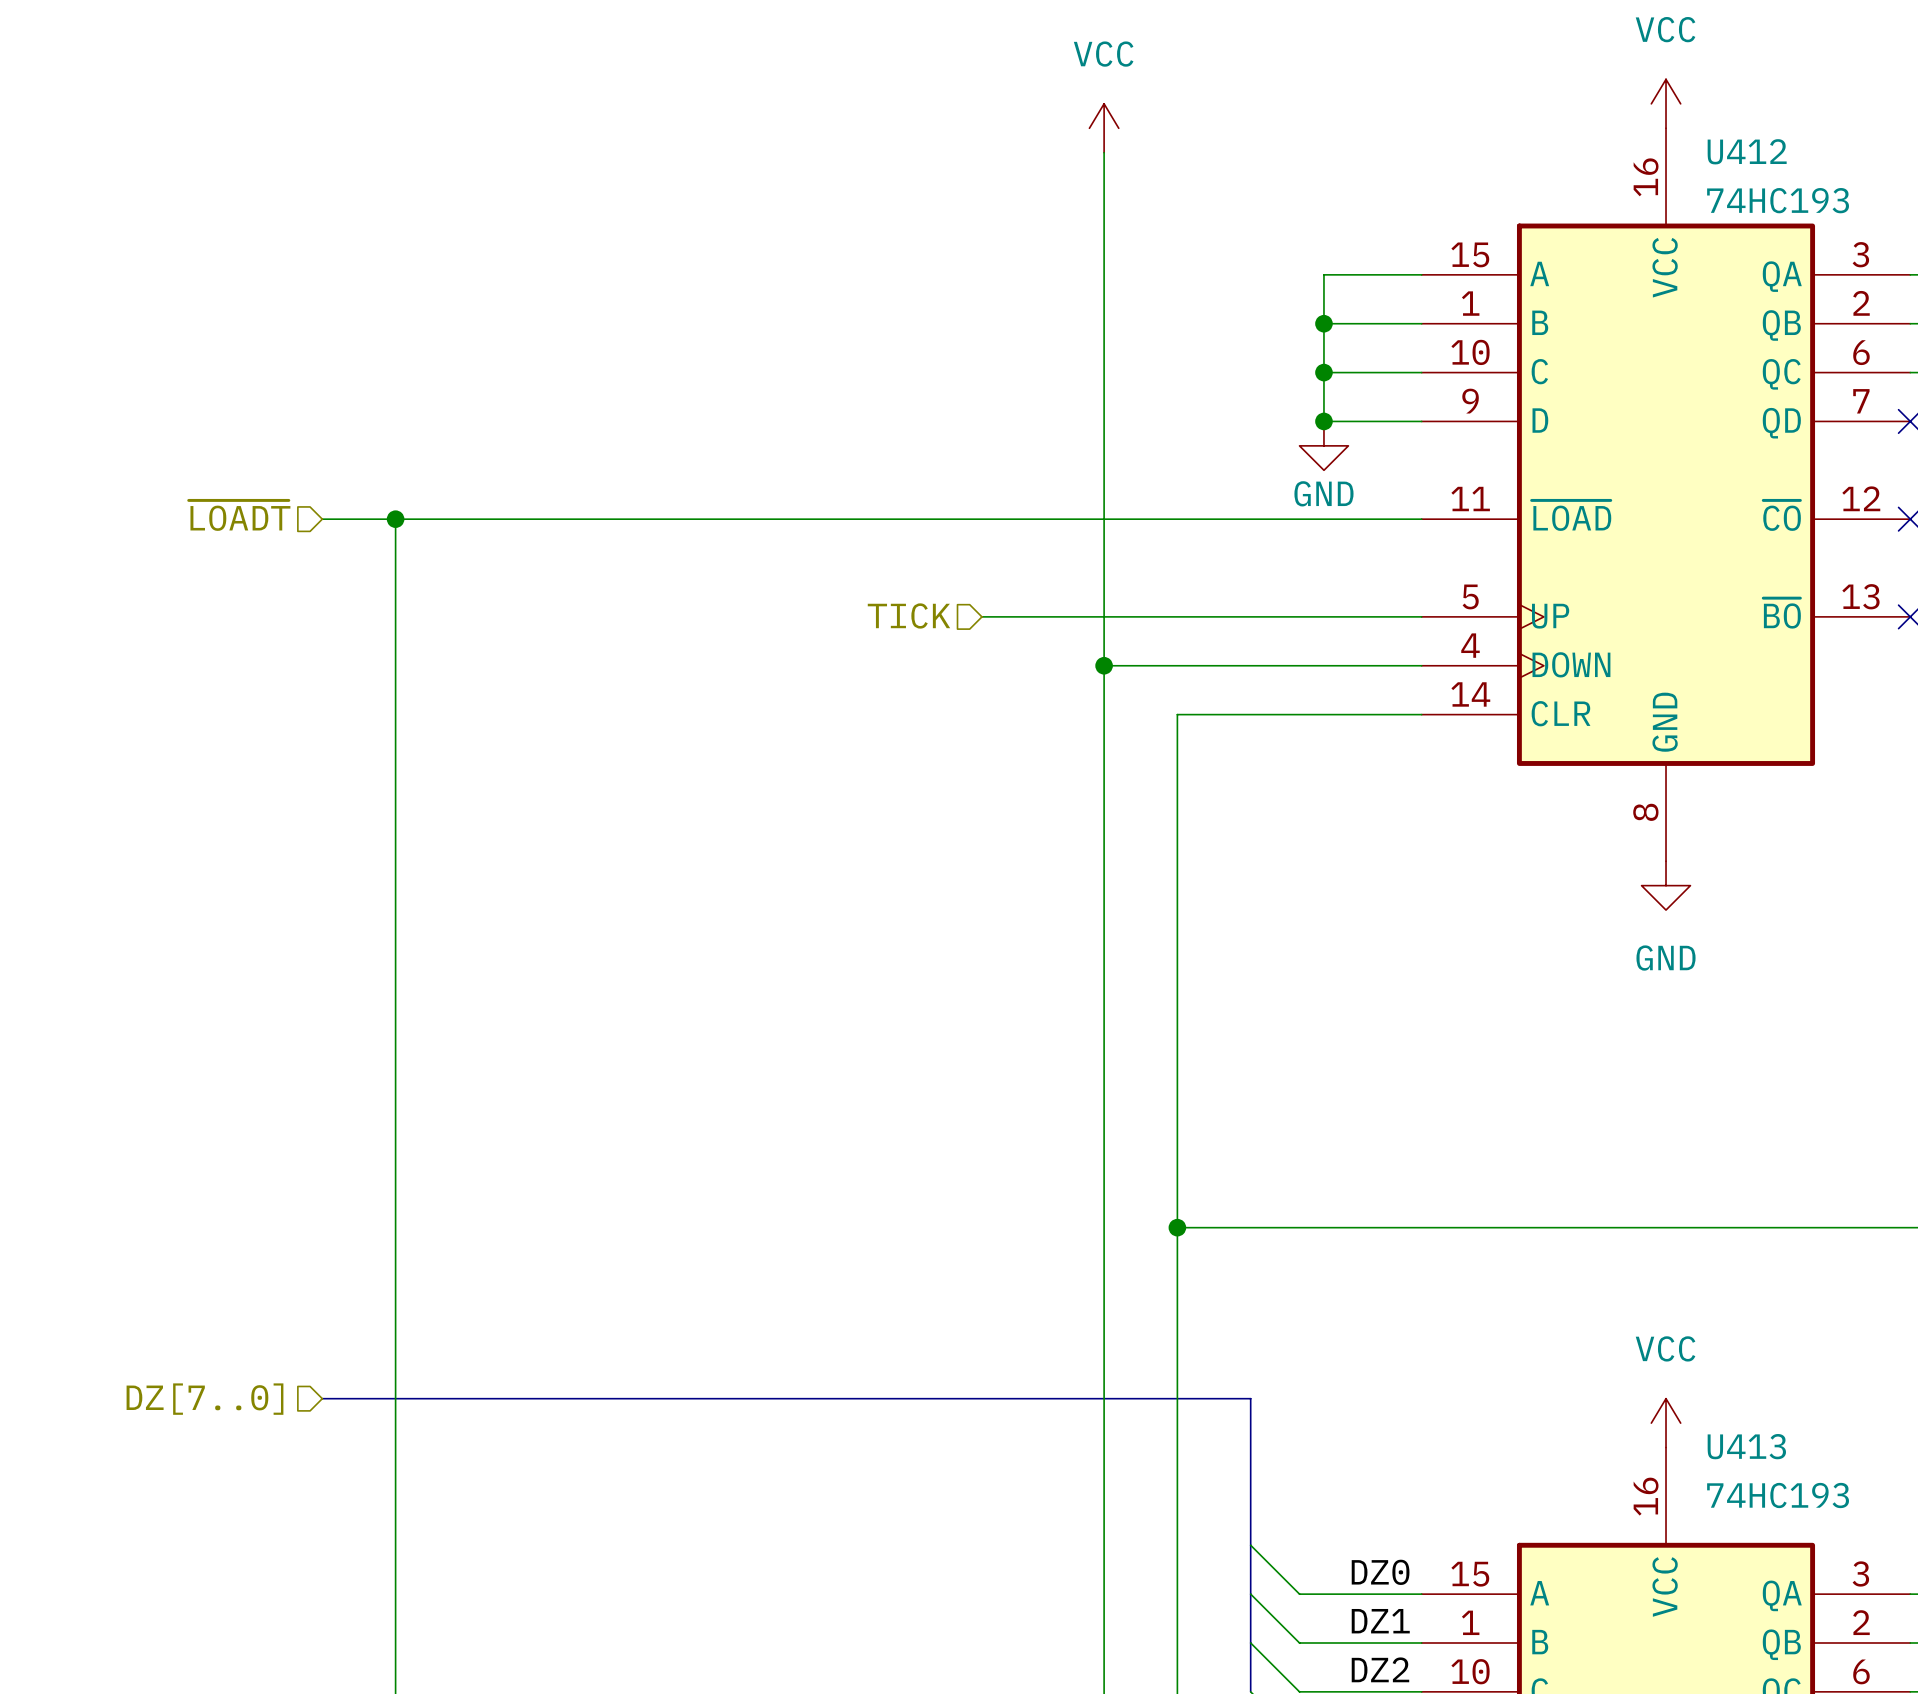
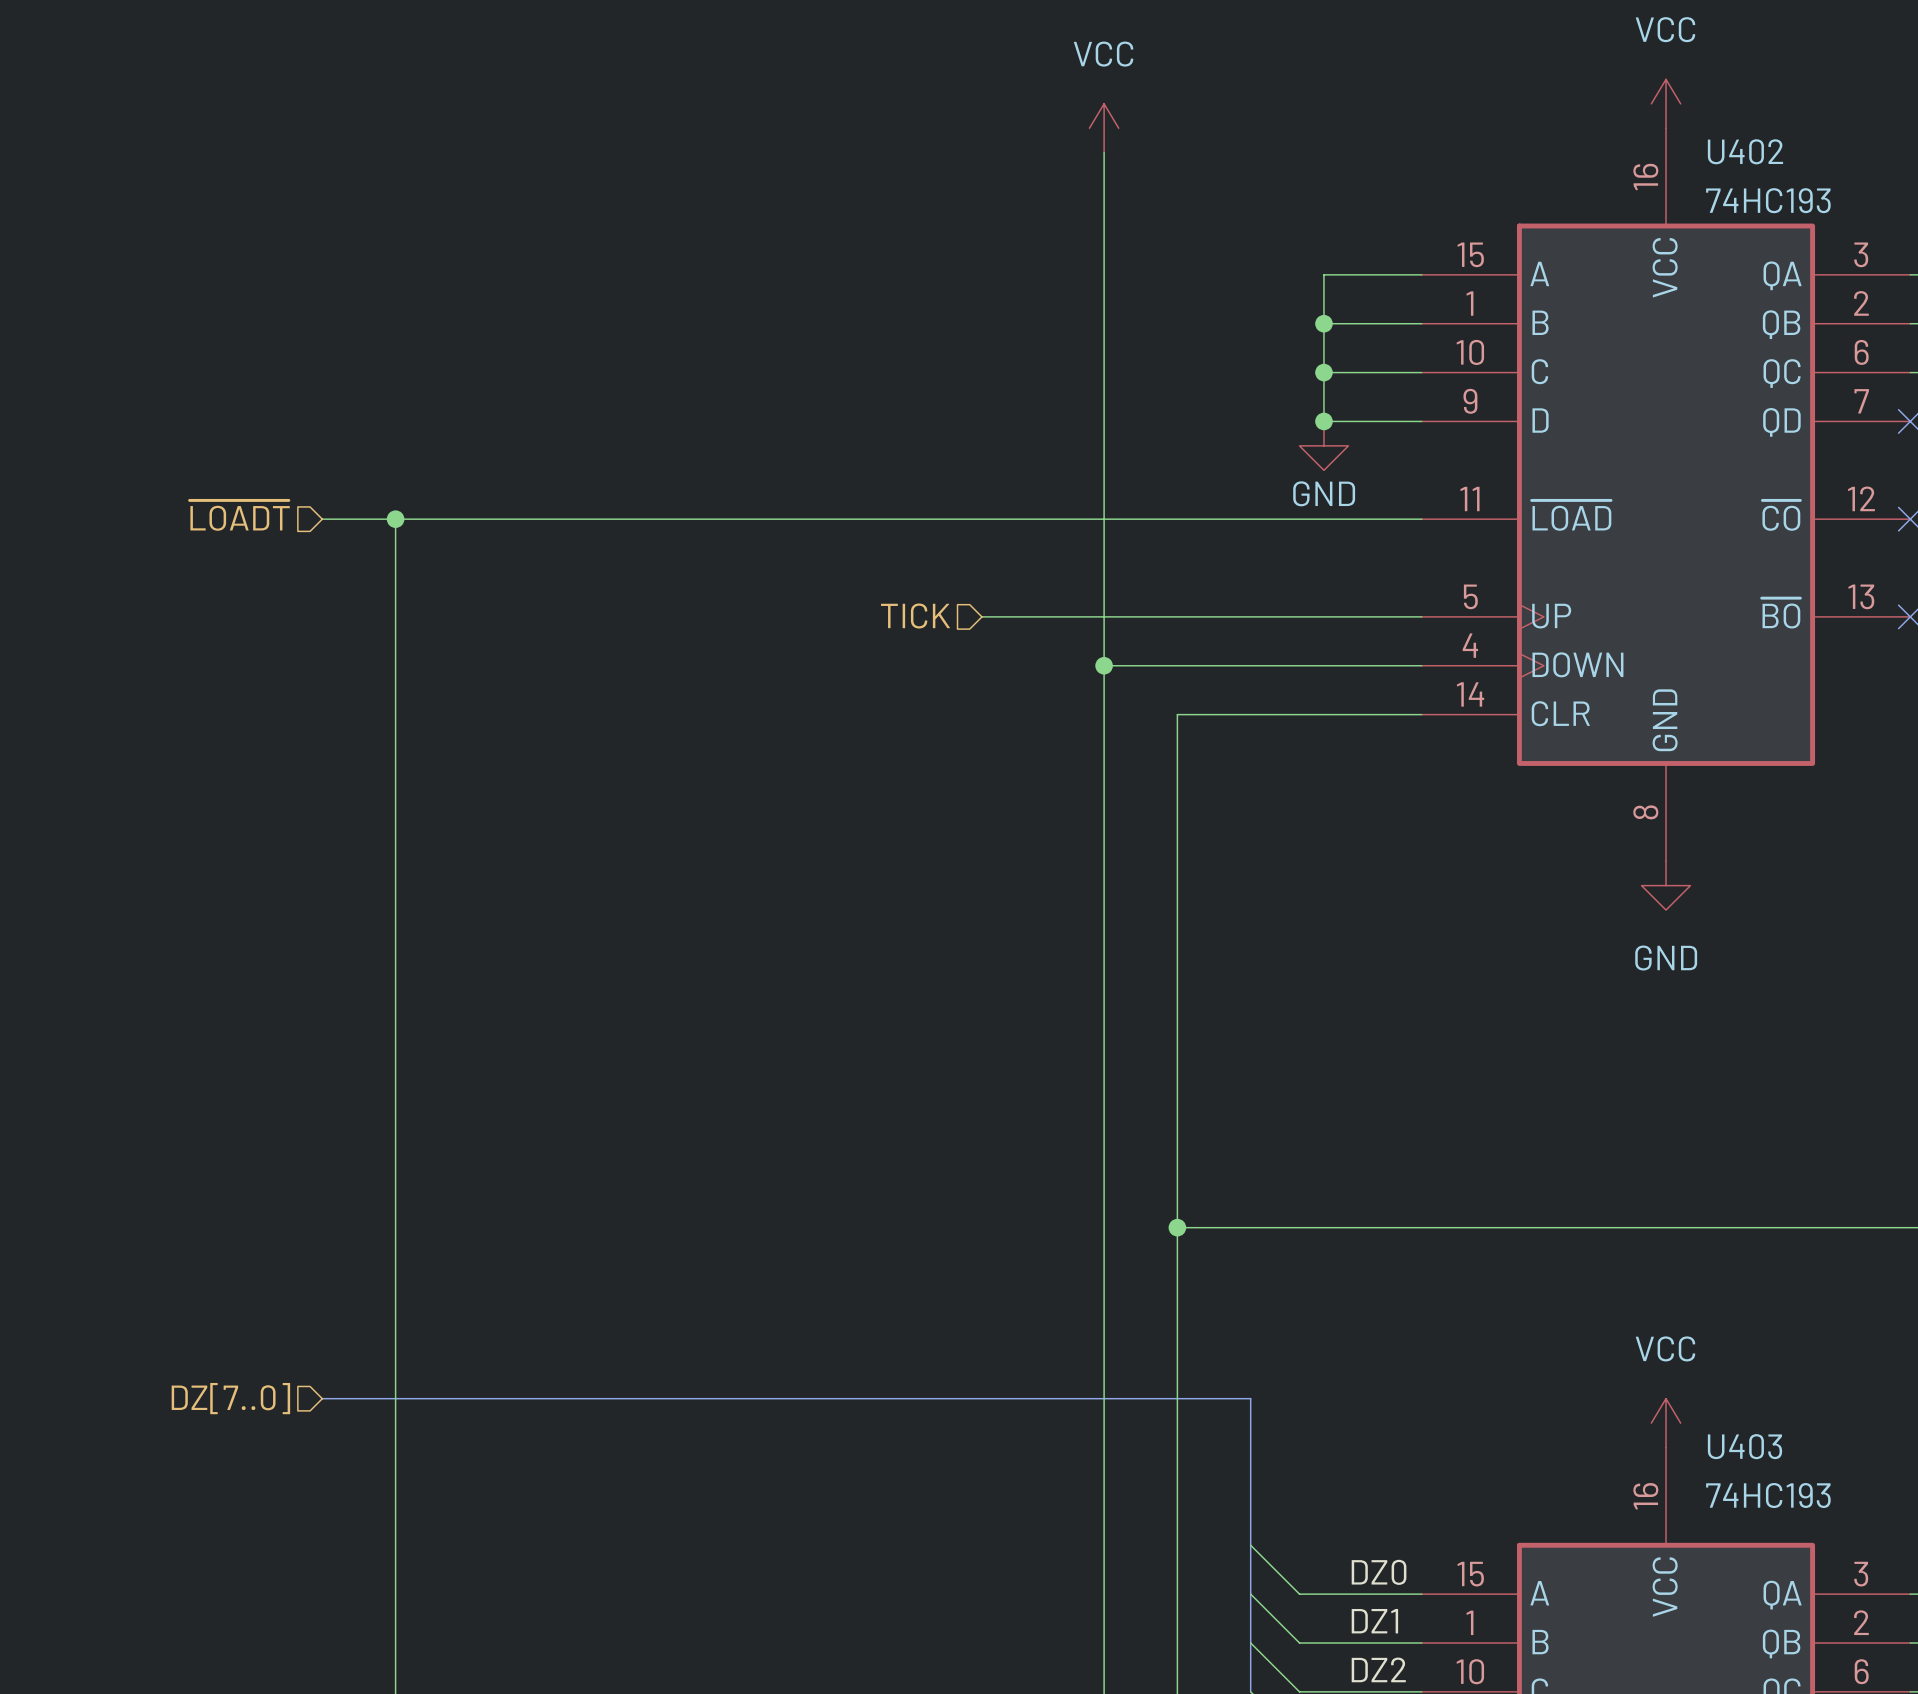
U412 name: U412 (1747, 151) -> U402 (1745, 151)
U413 name: U413 (1746, 1446) -> U403 (1744, 1446)

